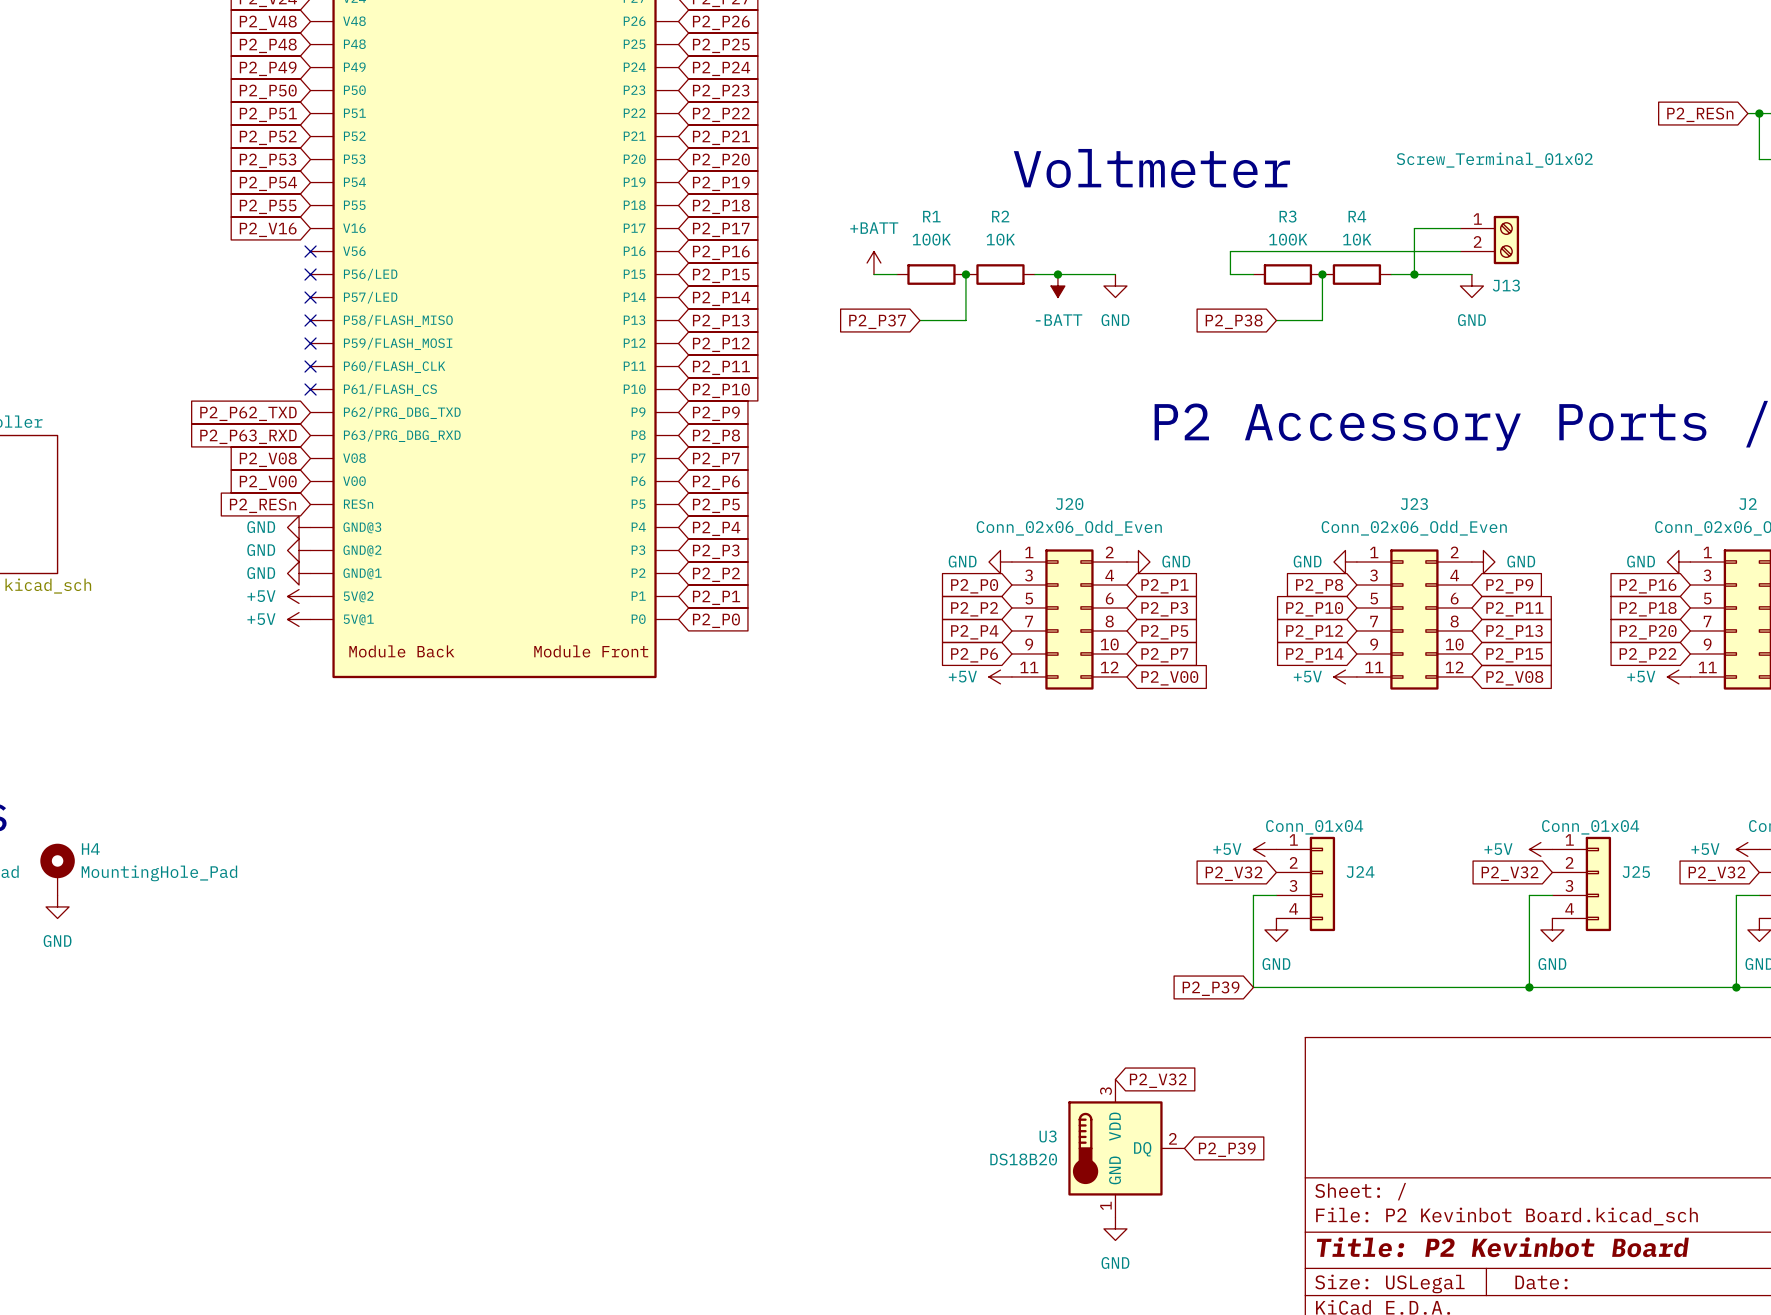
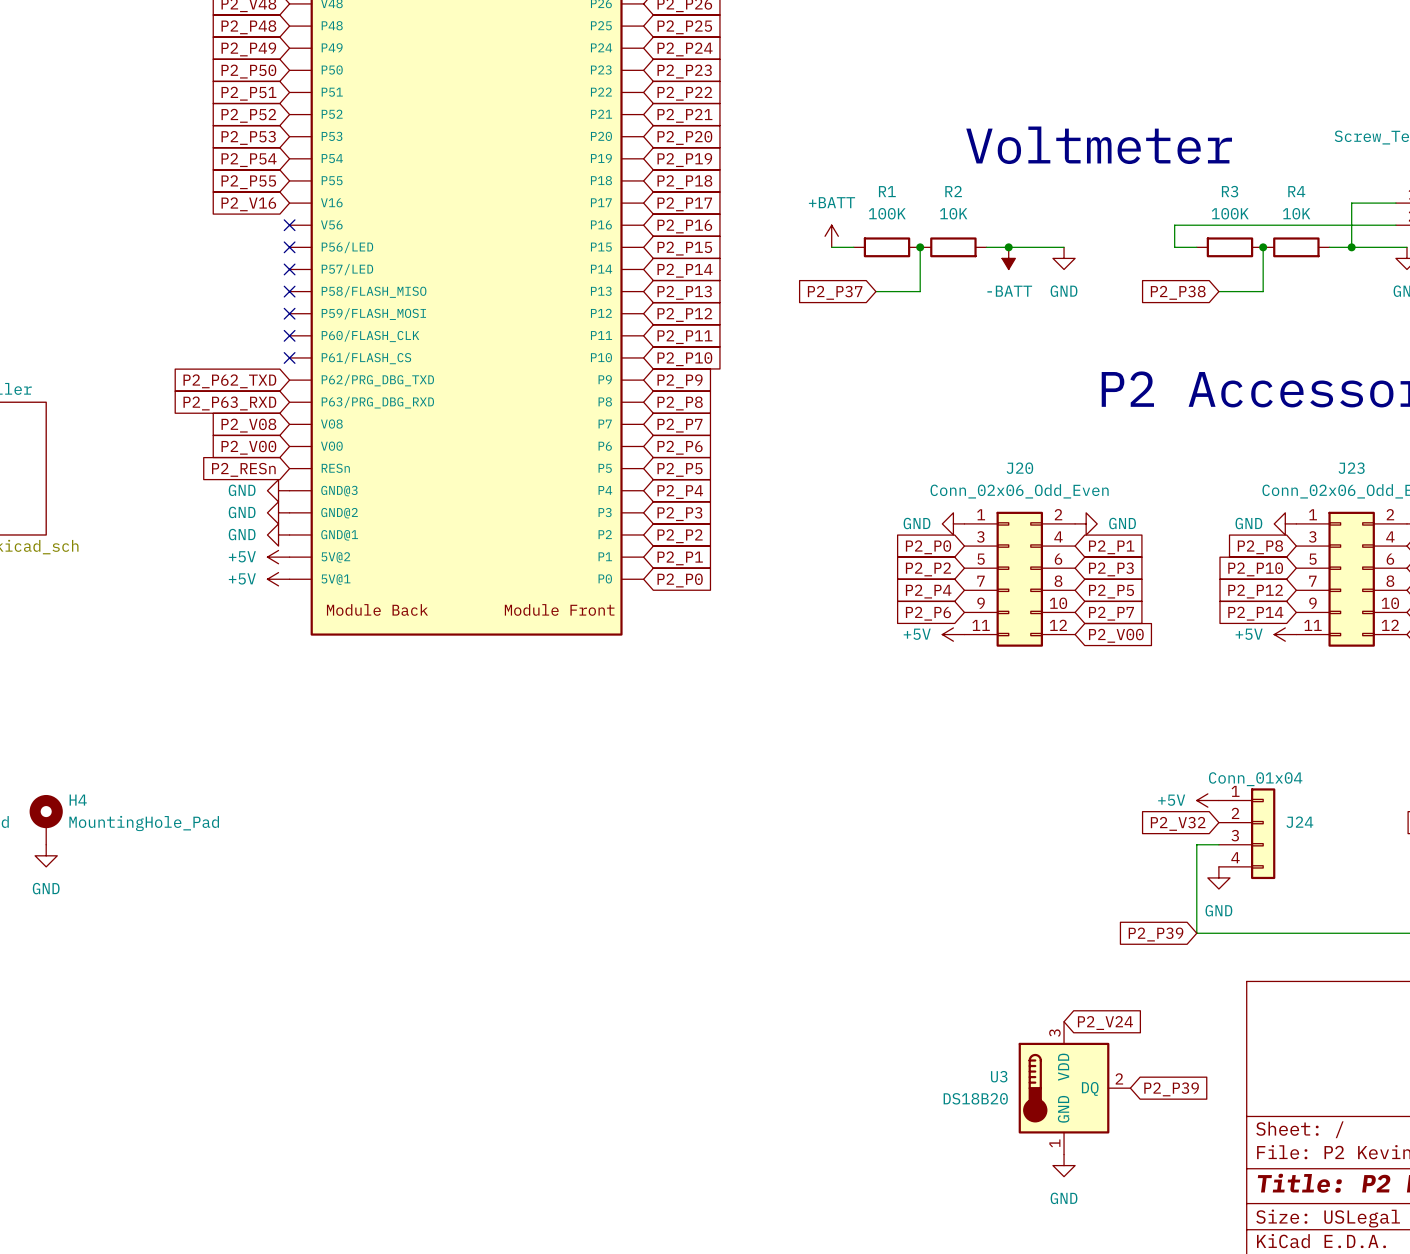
global label: P2_V32 (1158, 1080) -> P2_V24 (1105, 1023)

